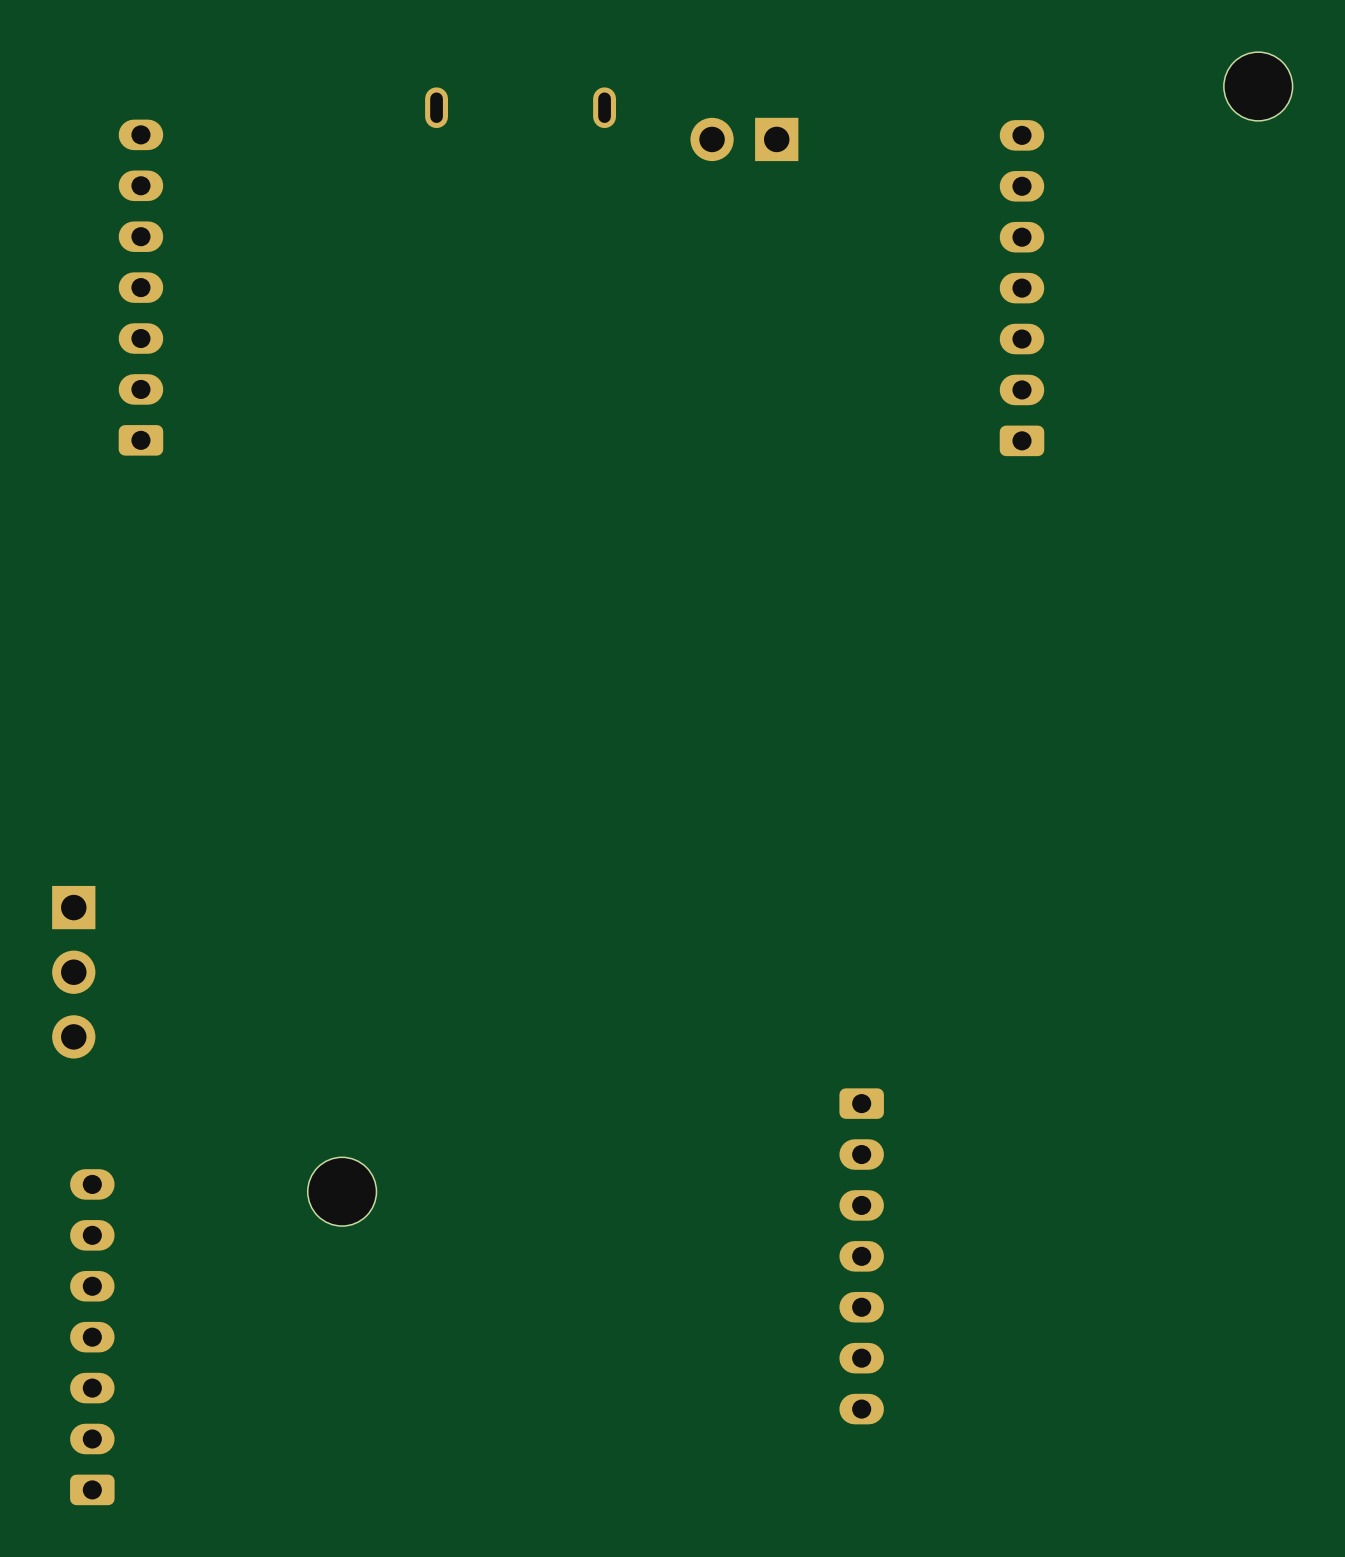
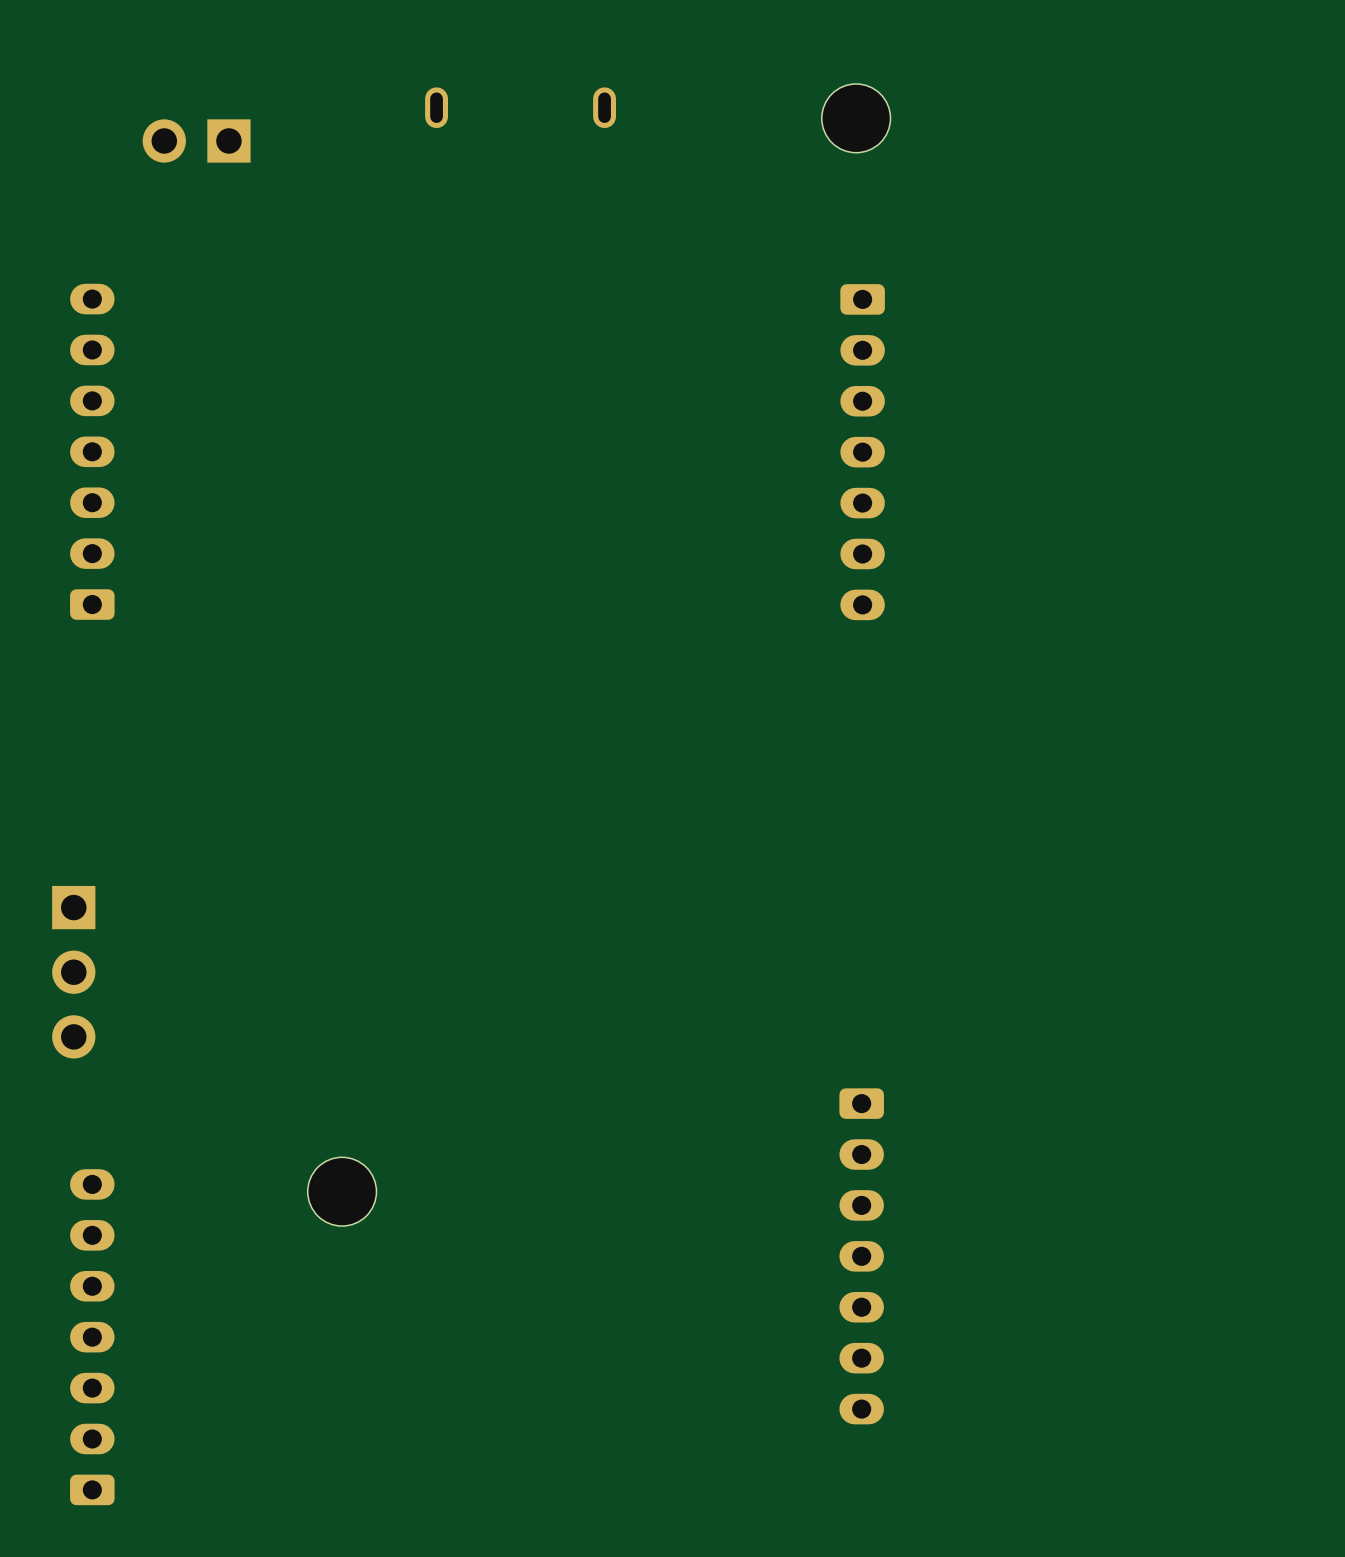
part position: (1258, 86) -> (856, 118)
part position: (744, 139) -> (196, 140)
part position: (140, 287) -> (92, 451)
part rotation: 0° (1021, 288) -> 180° (862, 452)
part position: (1021, 288) -> (862, 452)

